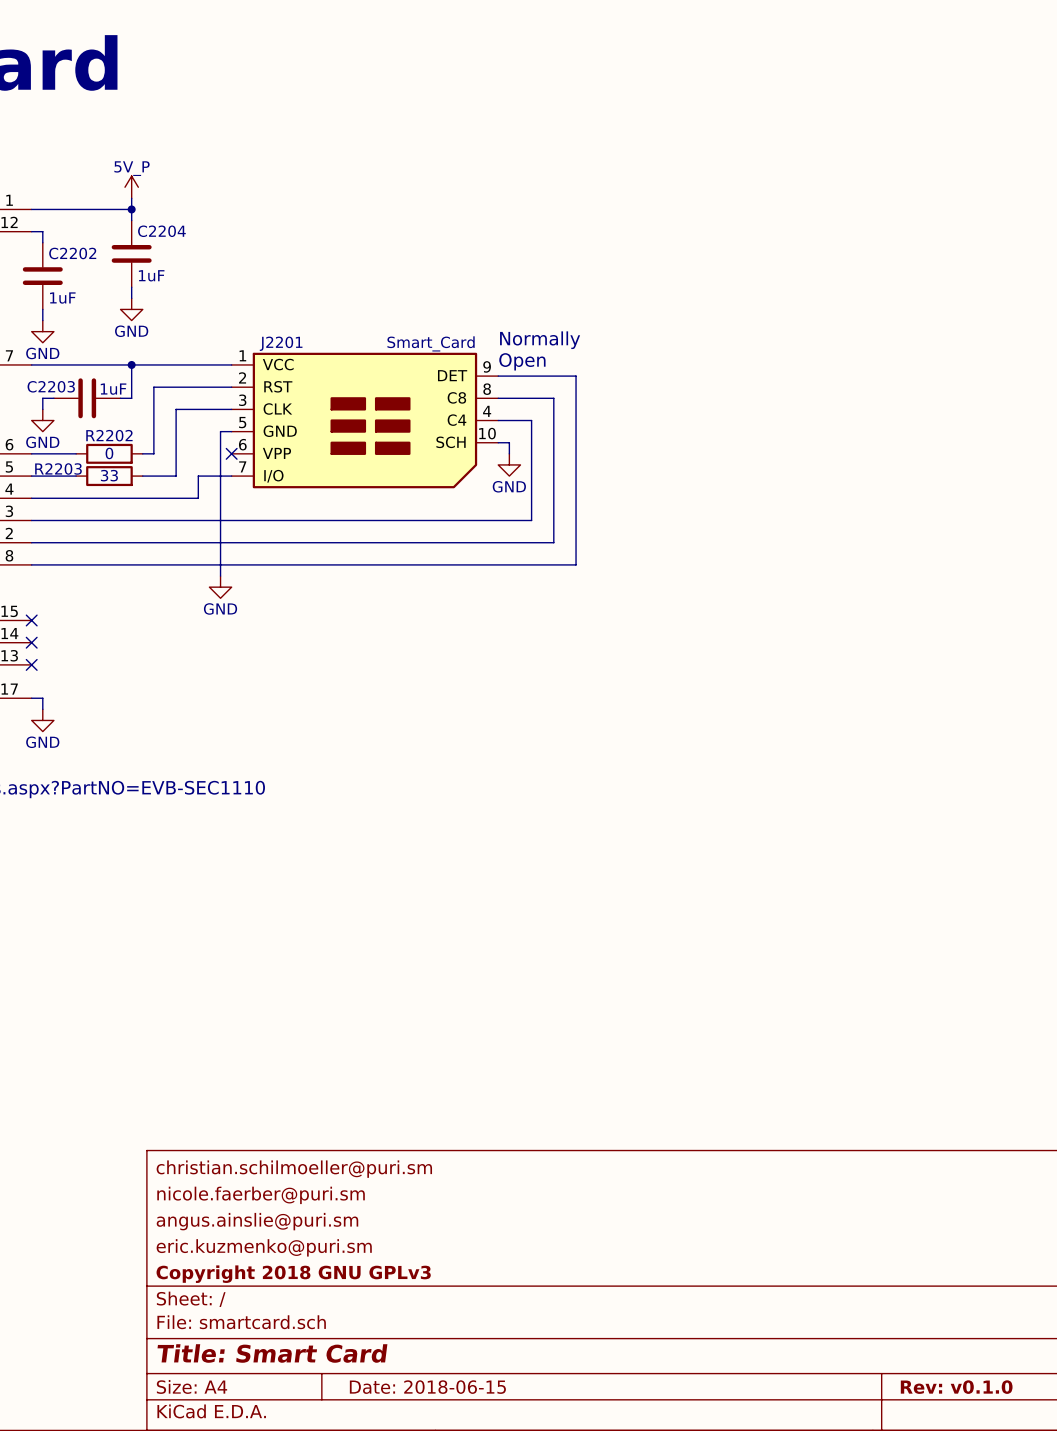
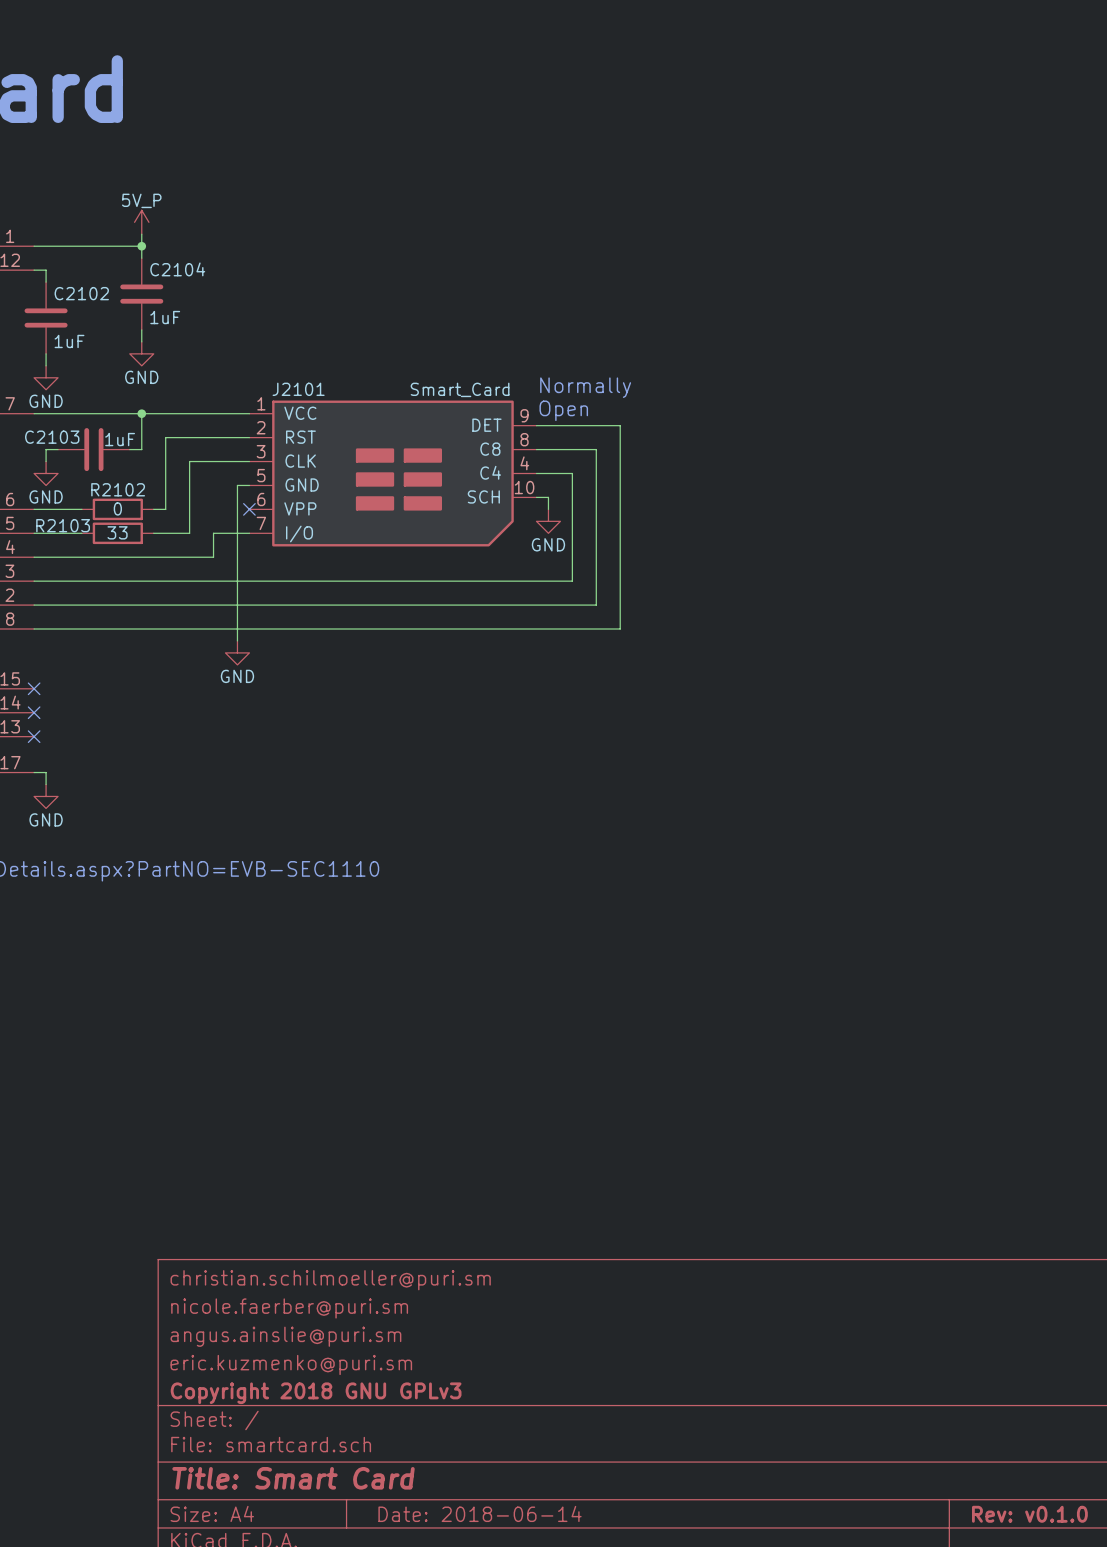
C2204 name: C2204 (161, 231) -> C2104 (177, 269)
C2202 name: C2202 (72, 253) -> C2102 (81, 293)
J2201 name: J2201 (281, 343) -> J2101 (298, 389)
C2203 name: C2203 (51, 386) -> C2103 (52, 437)
R2202 name: R2202 (109, 435) -> R2102 (118, 489)
R2203 name: R2203 (58, 468) -> R2103 (63, 525)
title block: Date: 2018-06-15 (427, 1387) -> Date: 2018-06-14 (480, 1513)

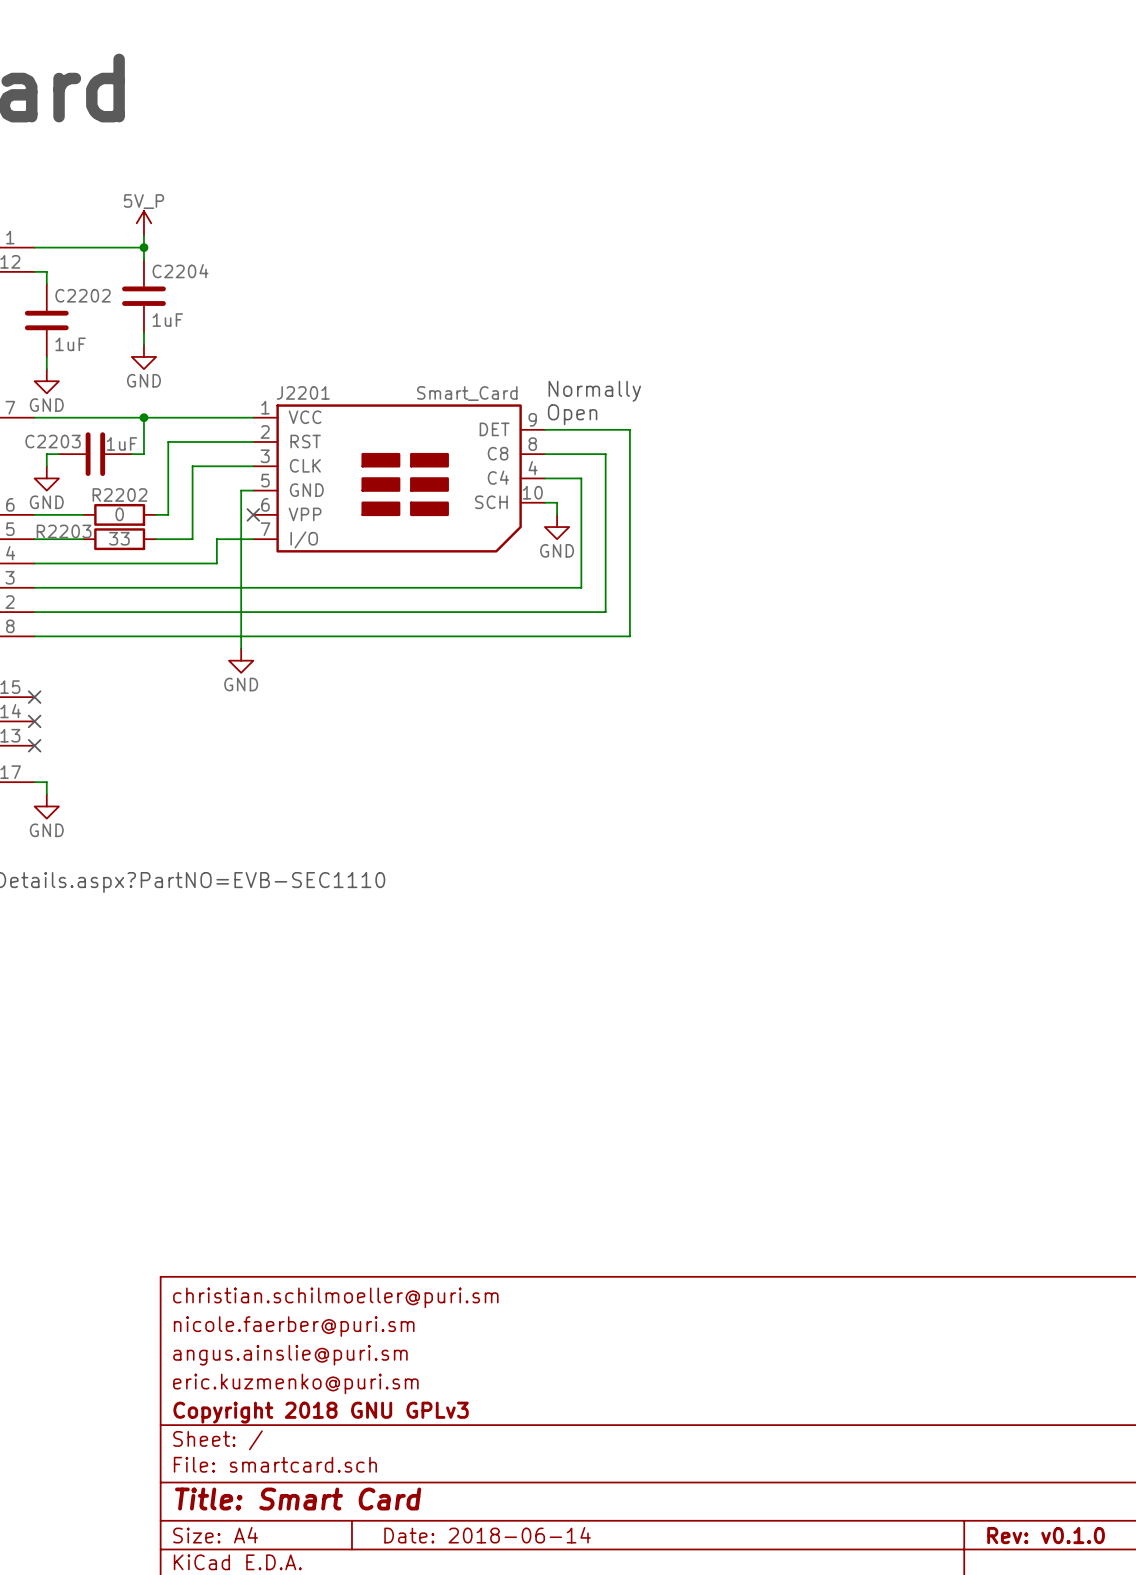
C2104 name: C2104 (177, 269) -> C2204 (180, 271)
C2102 name: C2102 (81, 293) -> C2202 (83, 295)
J2101 name: J2101 (298, 389) -> J2201 (303, 392)
C2103 name: C2103 (52, 437) -> C2203 (53, 441)
R2102 name: R2102 (118, 489) -> R2202 (119, 495)
R2103 name: R2103 (63, 525) -> R2203 (64, 531)

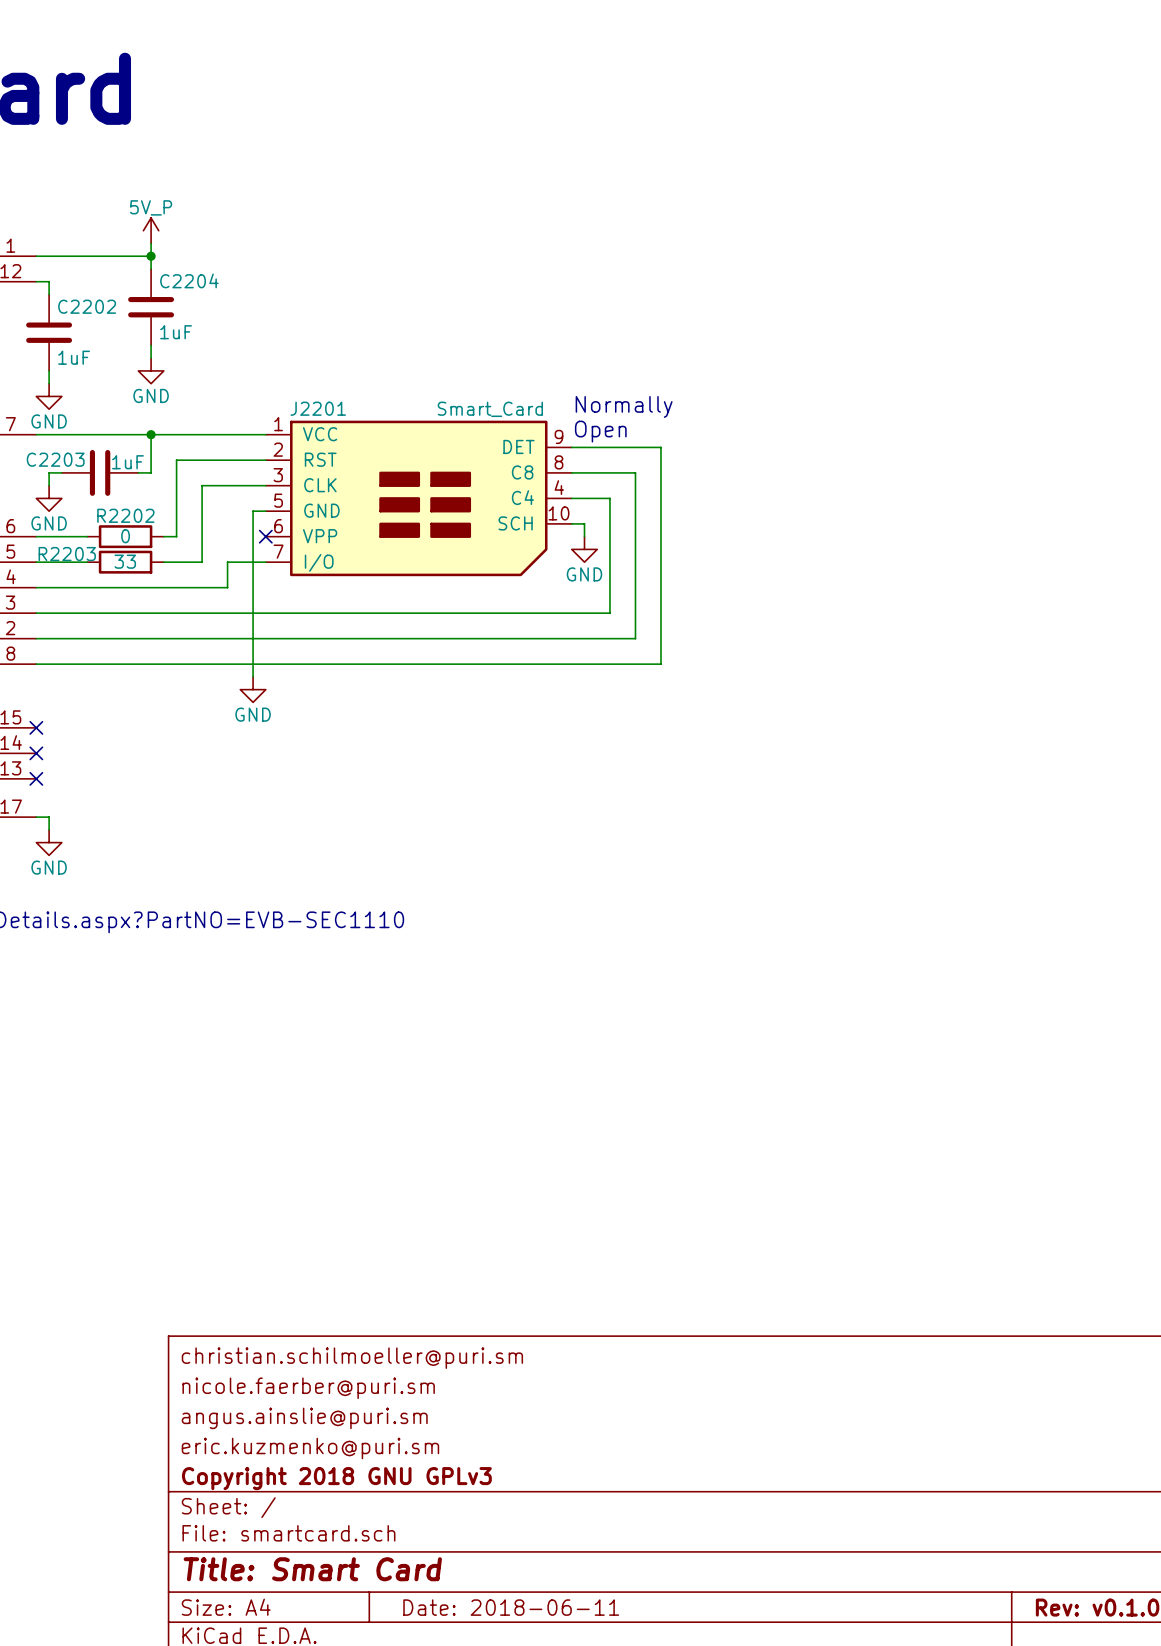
title block: Date: 2018-06-14 (487, 1535) -> Date: 2018-06-11 (511, 1607)

